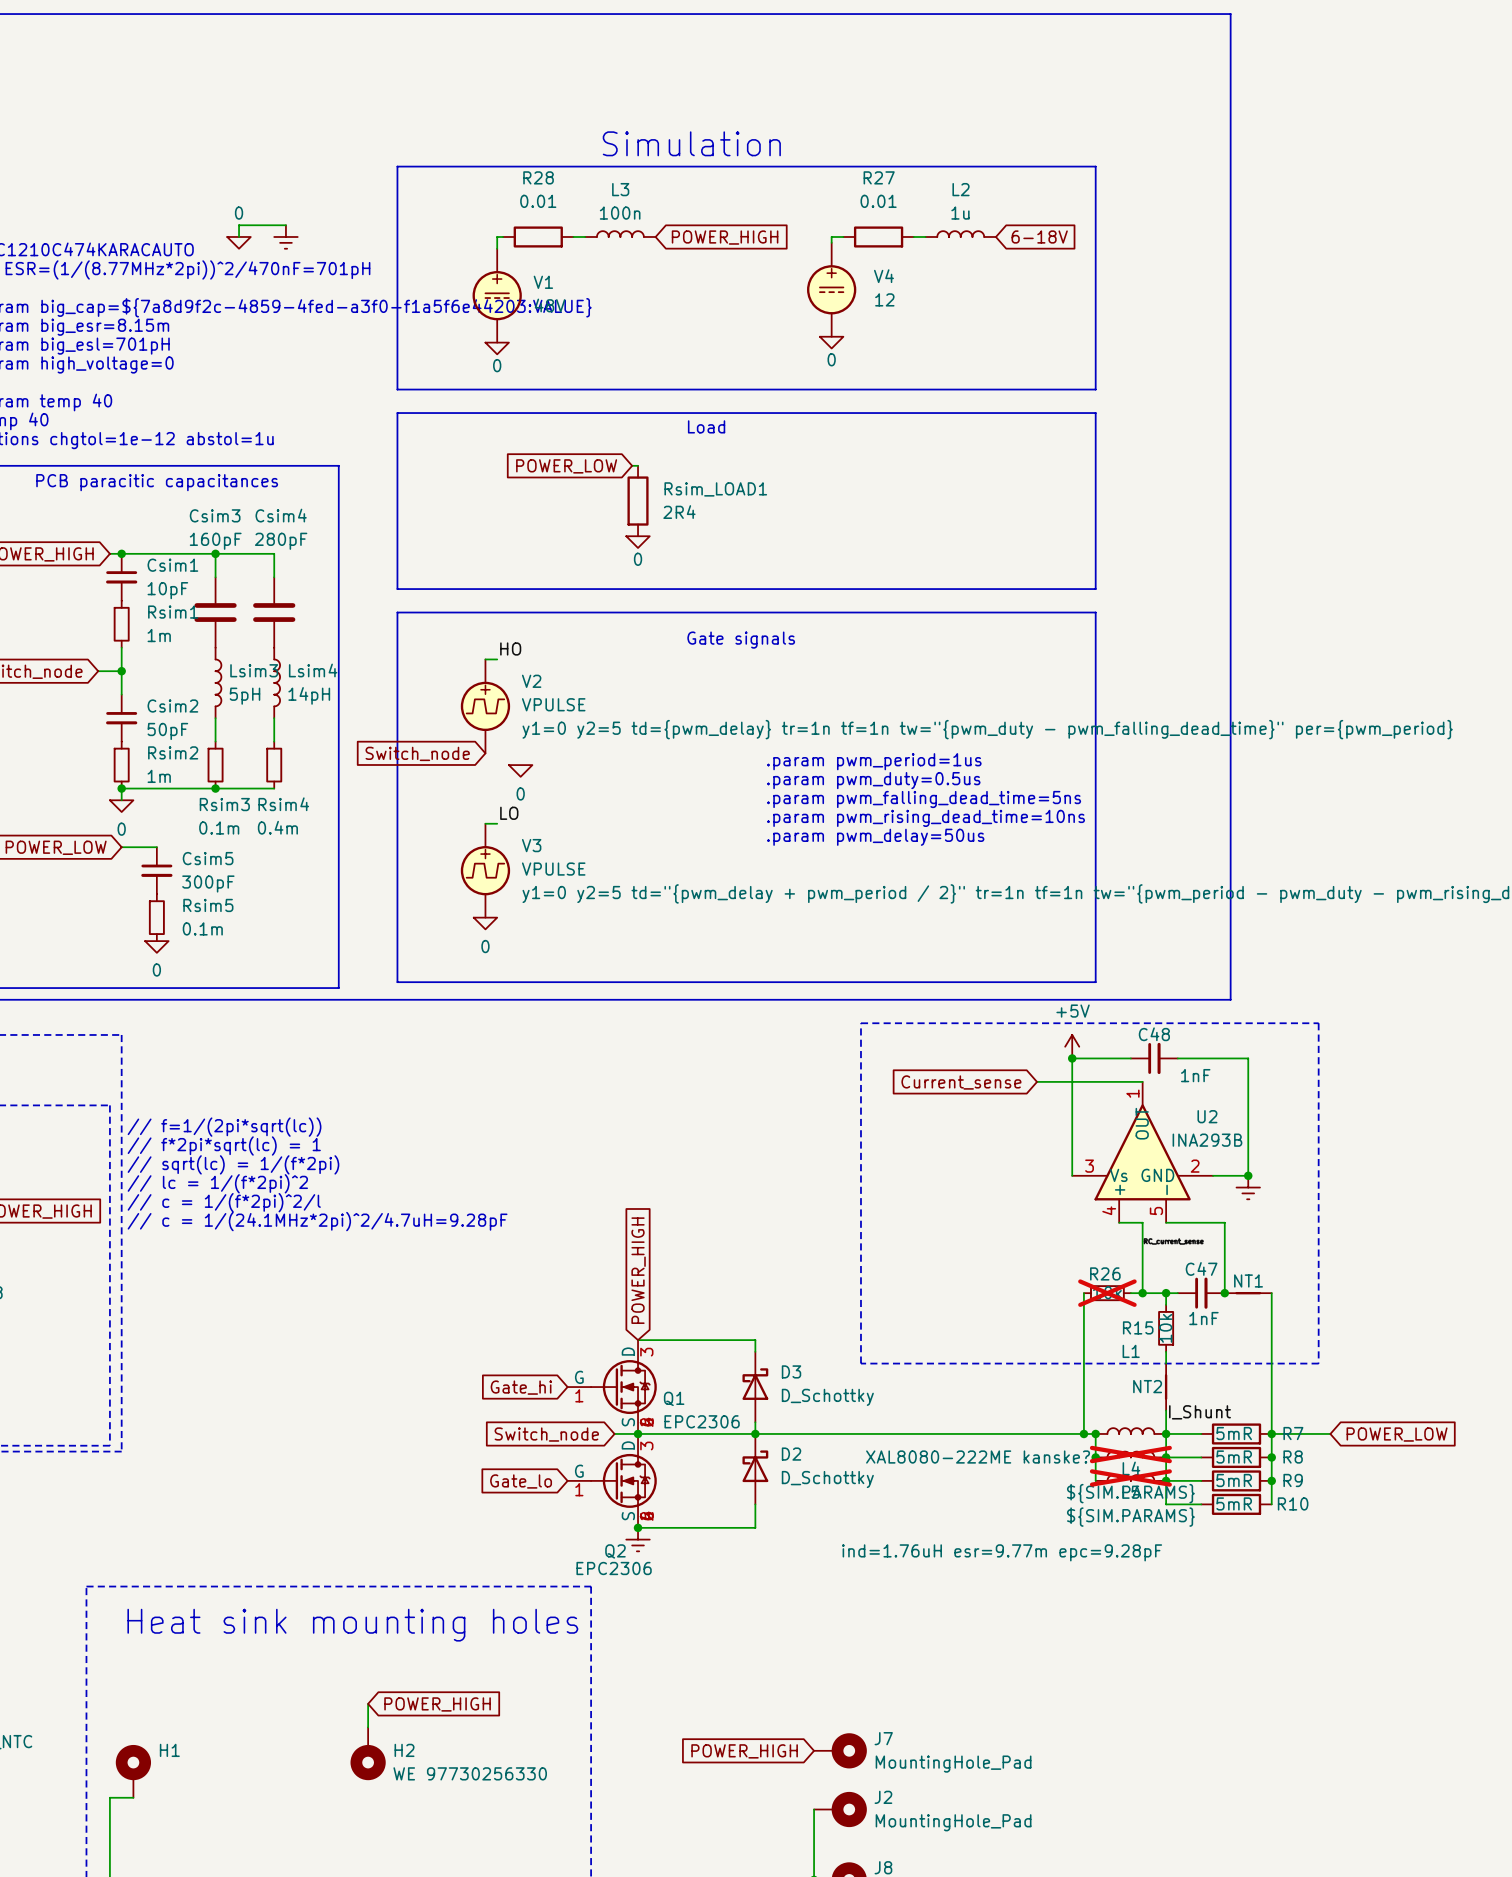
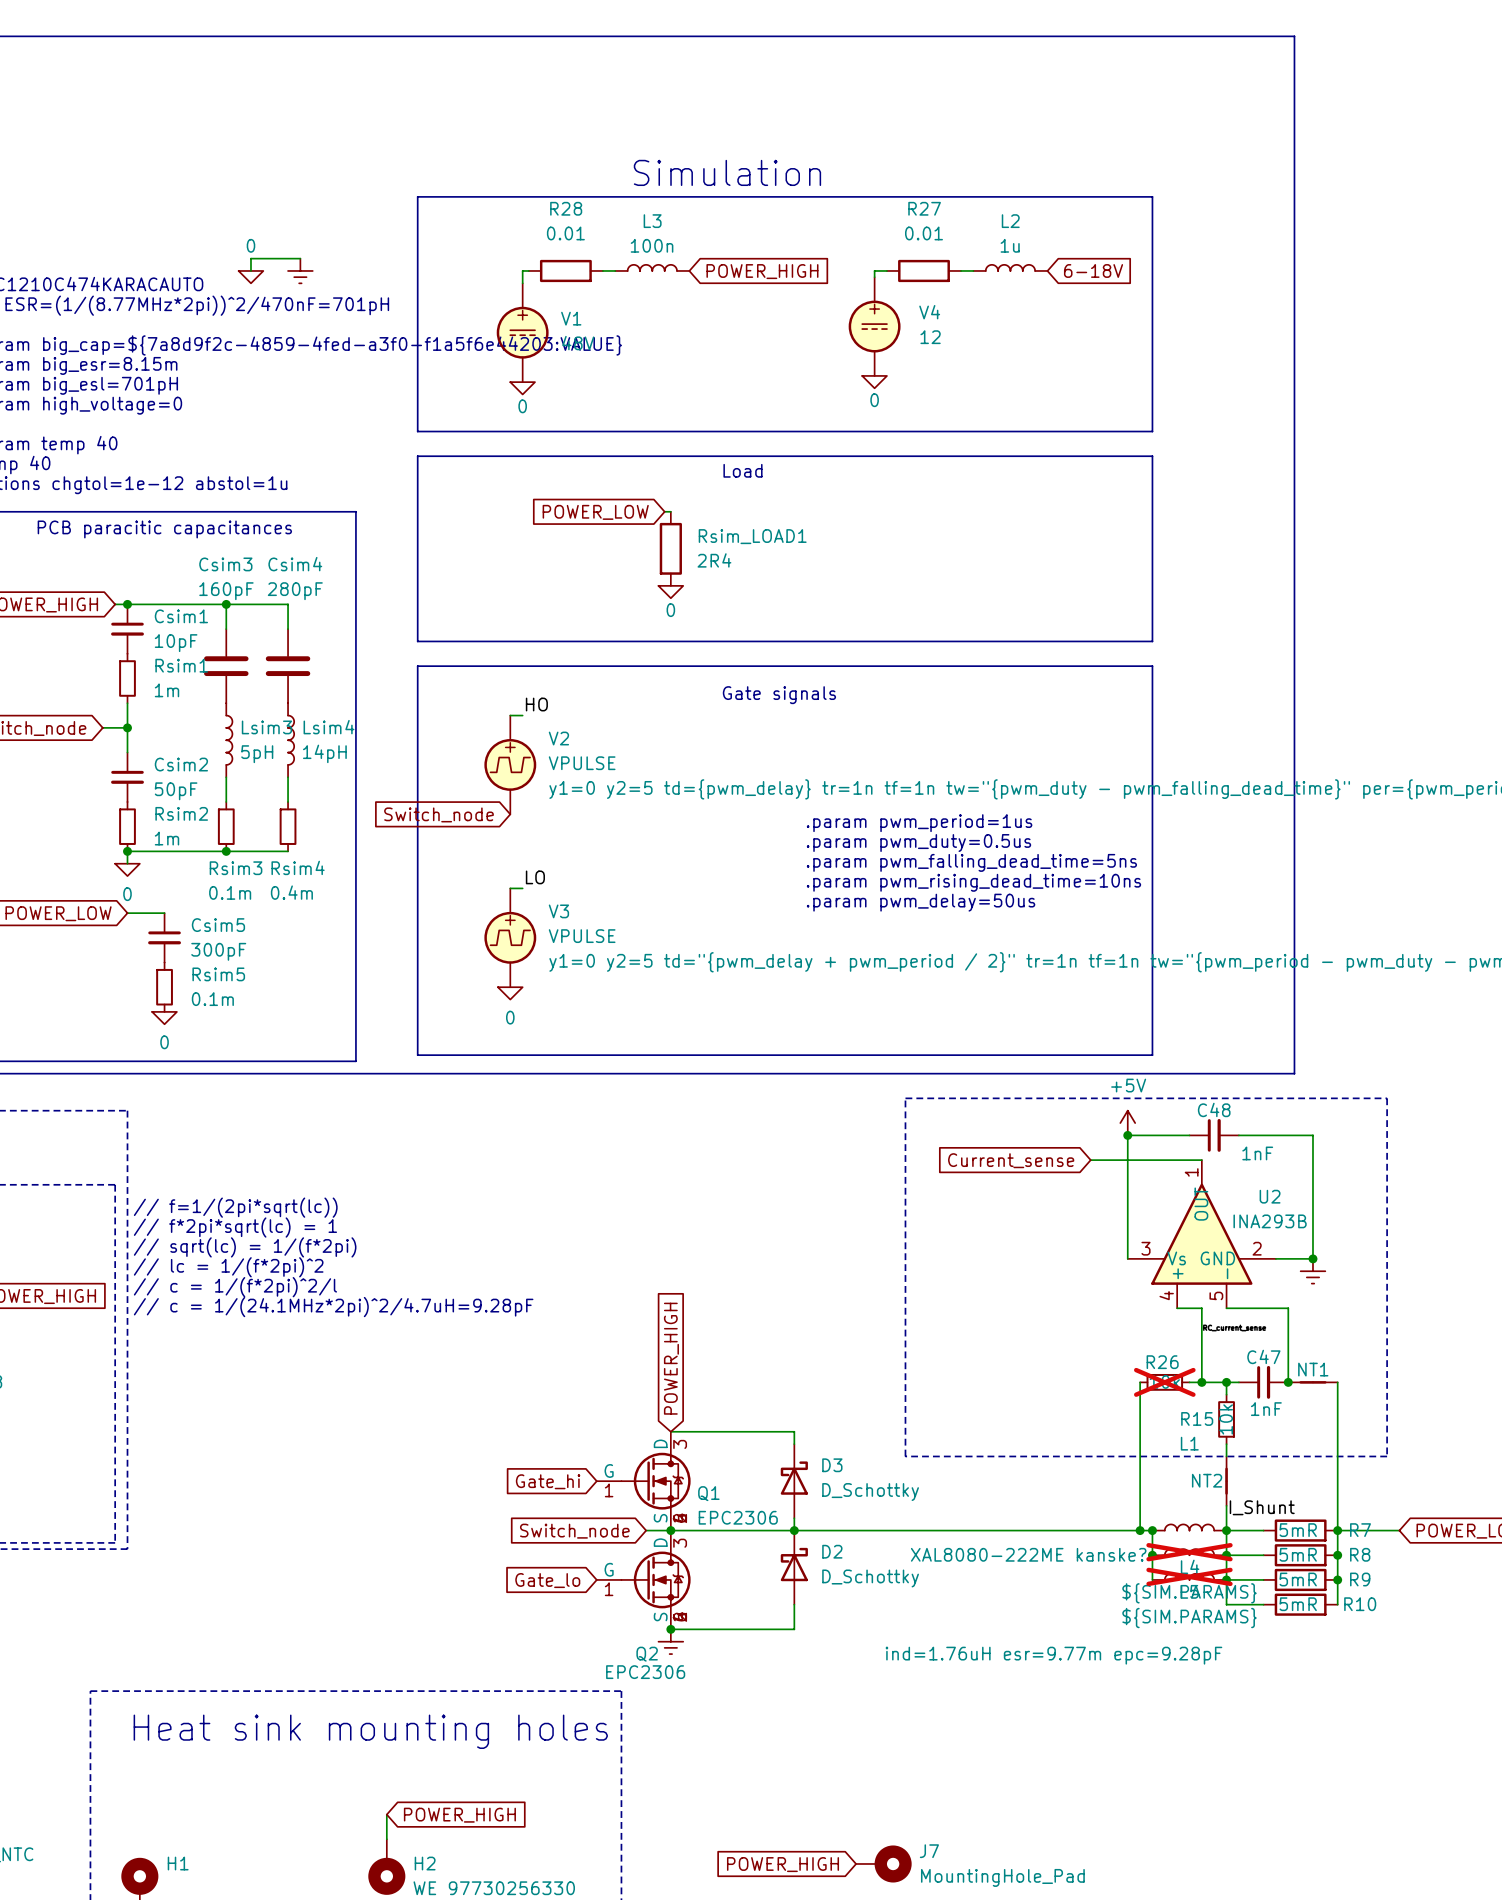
power symbol: 0 (520, 770) -> none

